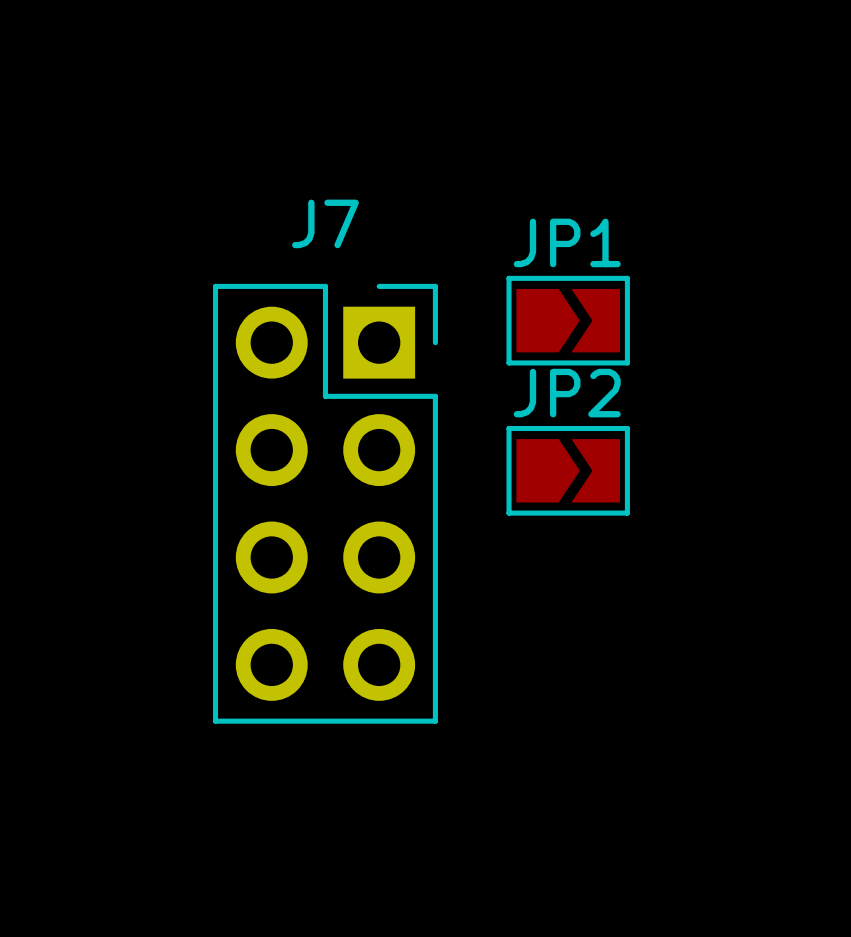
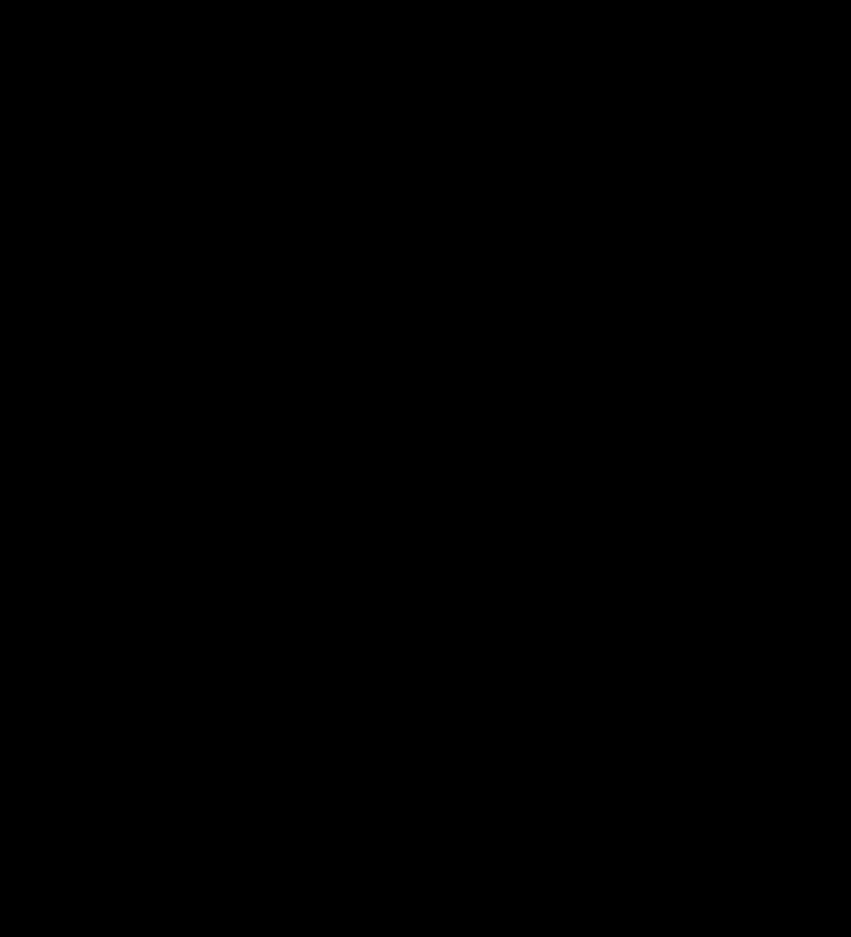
JP1: (568, 320) -> none
JP2: (568, 470) -> none
J7: (325, 503) -> none

